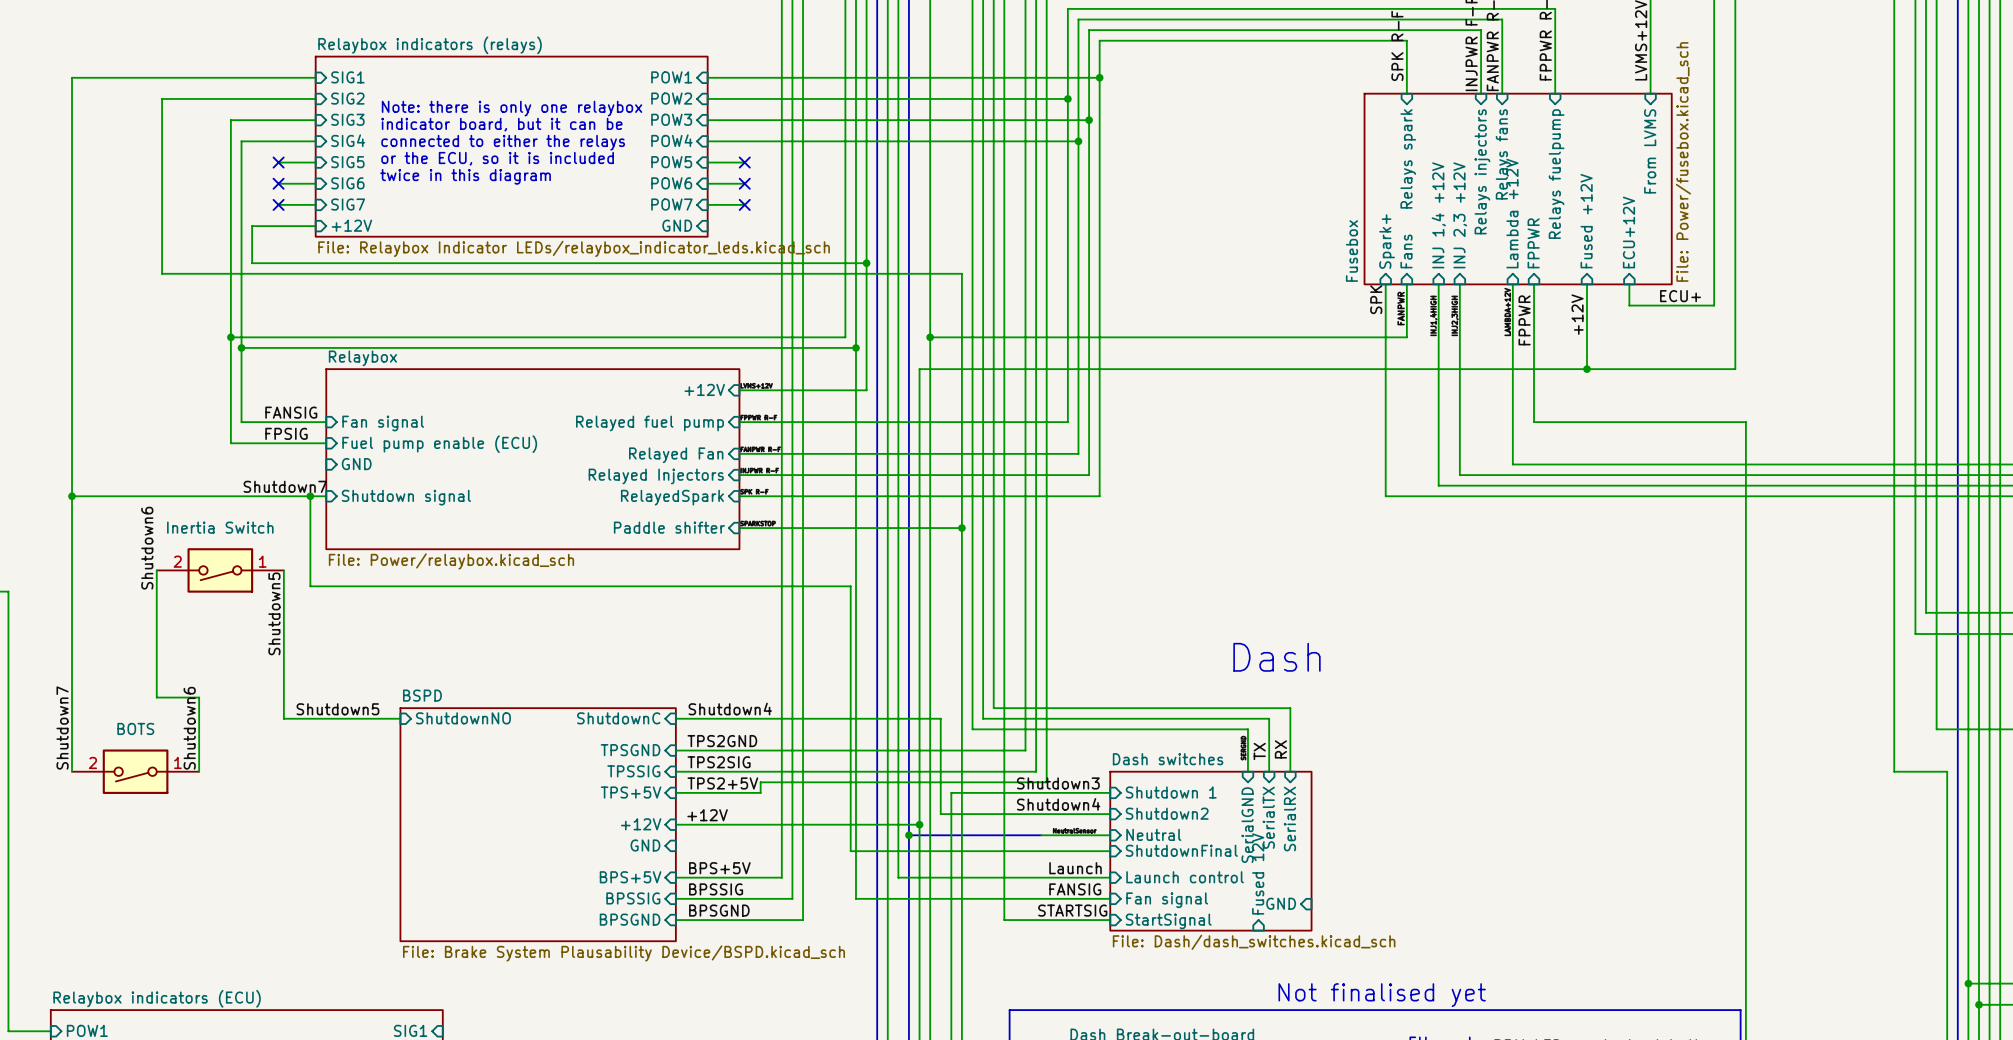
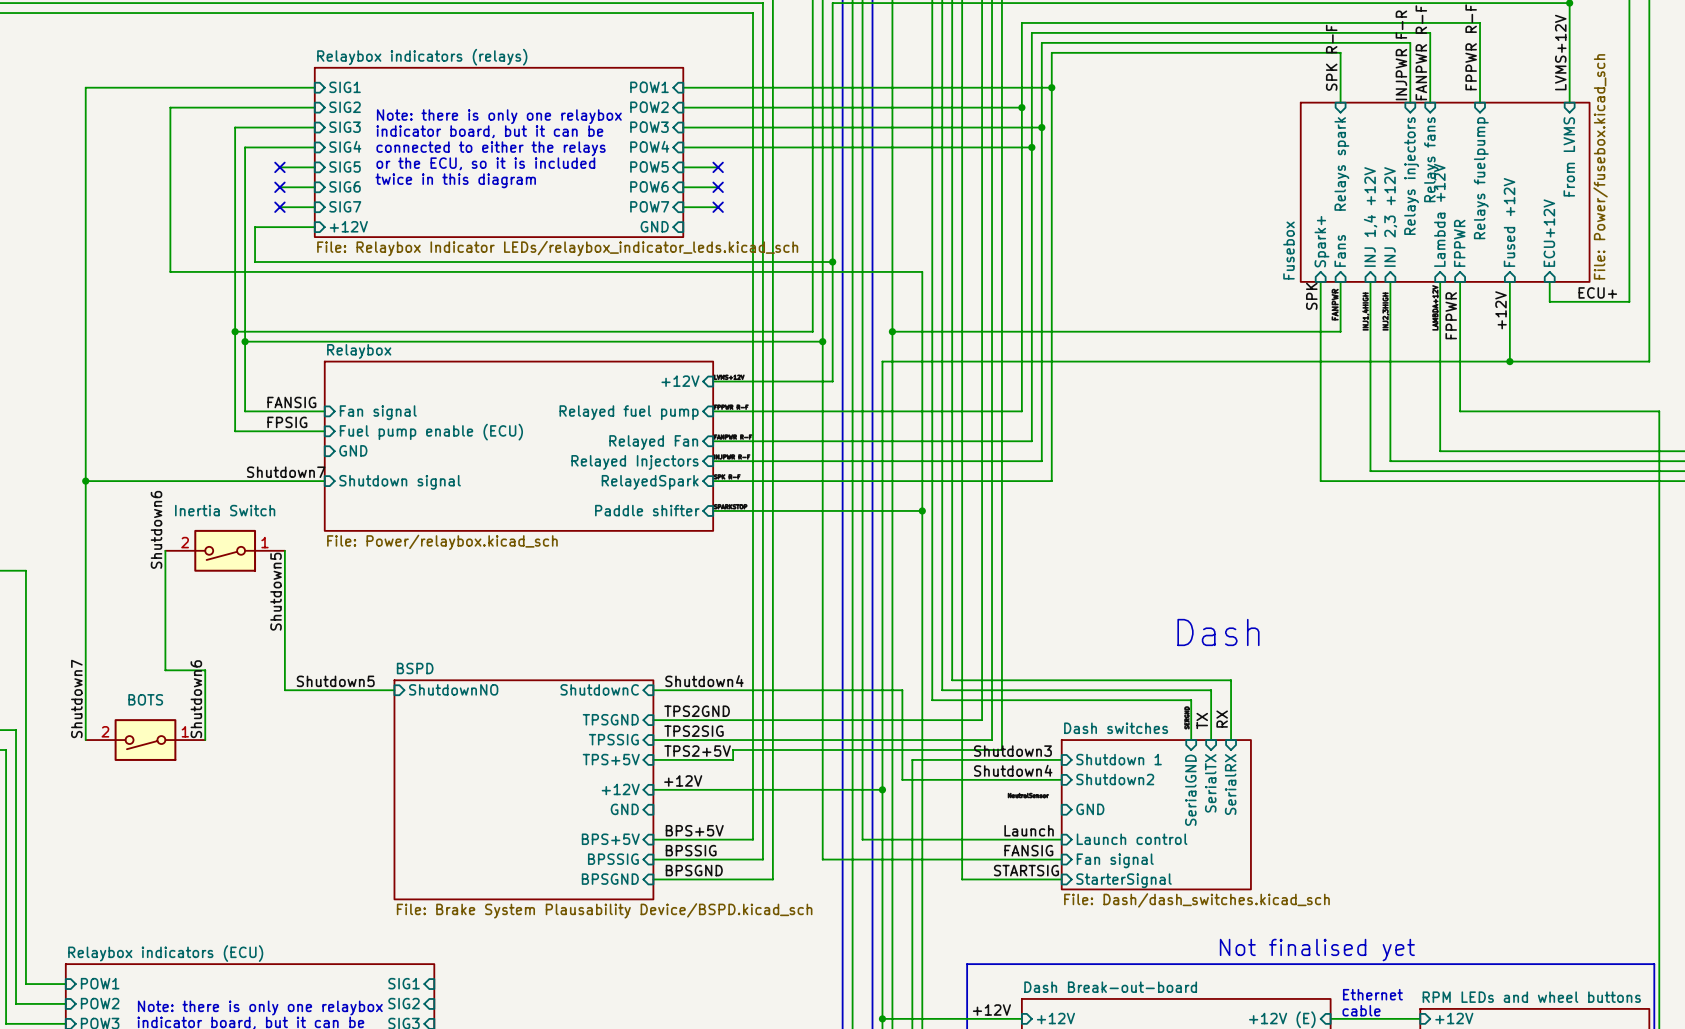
wire: (310, 496) (310, 586) (850, 586) (850, 851) (1110, 851) -> none
junction: (310, 496) -> none
sheet pin: Neutral (1153, 834) -> none
bus: (908, 835) (1041, 835) -> none
junction: (908, 835) -> none
wire: (1041, 835) (1110, 835) -> none
sheet pin: ShutdownFinal (1181, 850) -> none
sheet pin: Fused 12V (1258, 873) -> none
sheet pin rotation: 0° (1281, 903) -> 180° (1090, 809)
sheet pin position: GND (1281, 903) -> GND (1090, 809)
sheet pin: StartSignal (1168, 921) -> StarterSignal (1124, 880)

